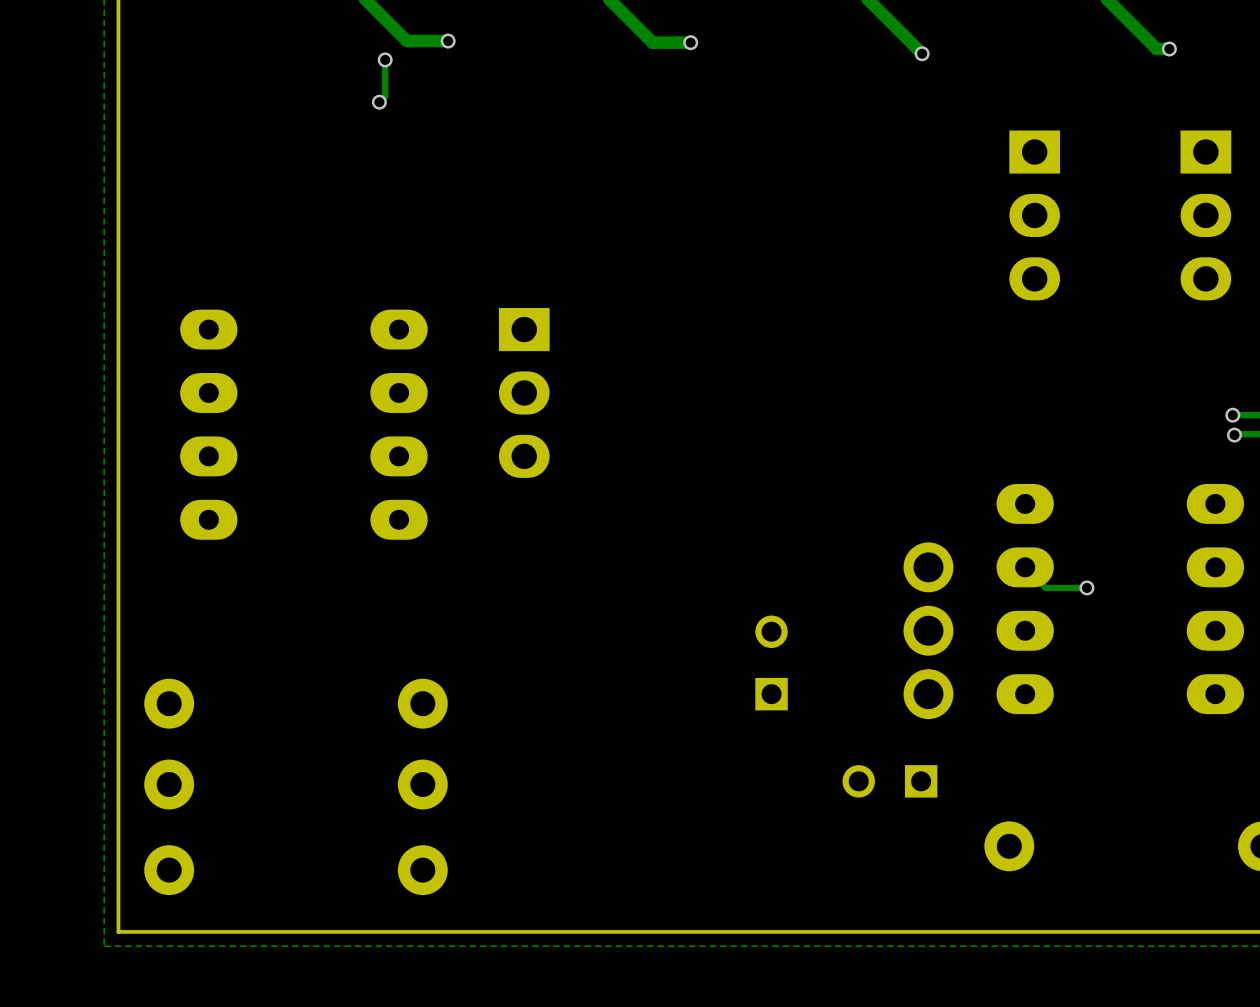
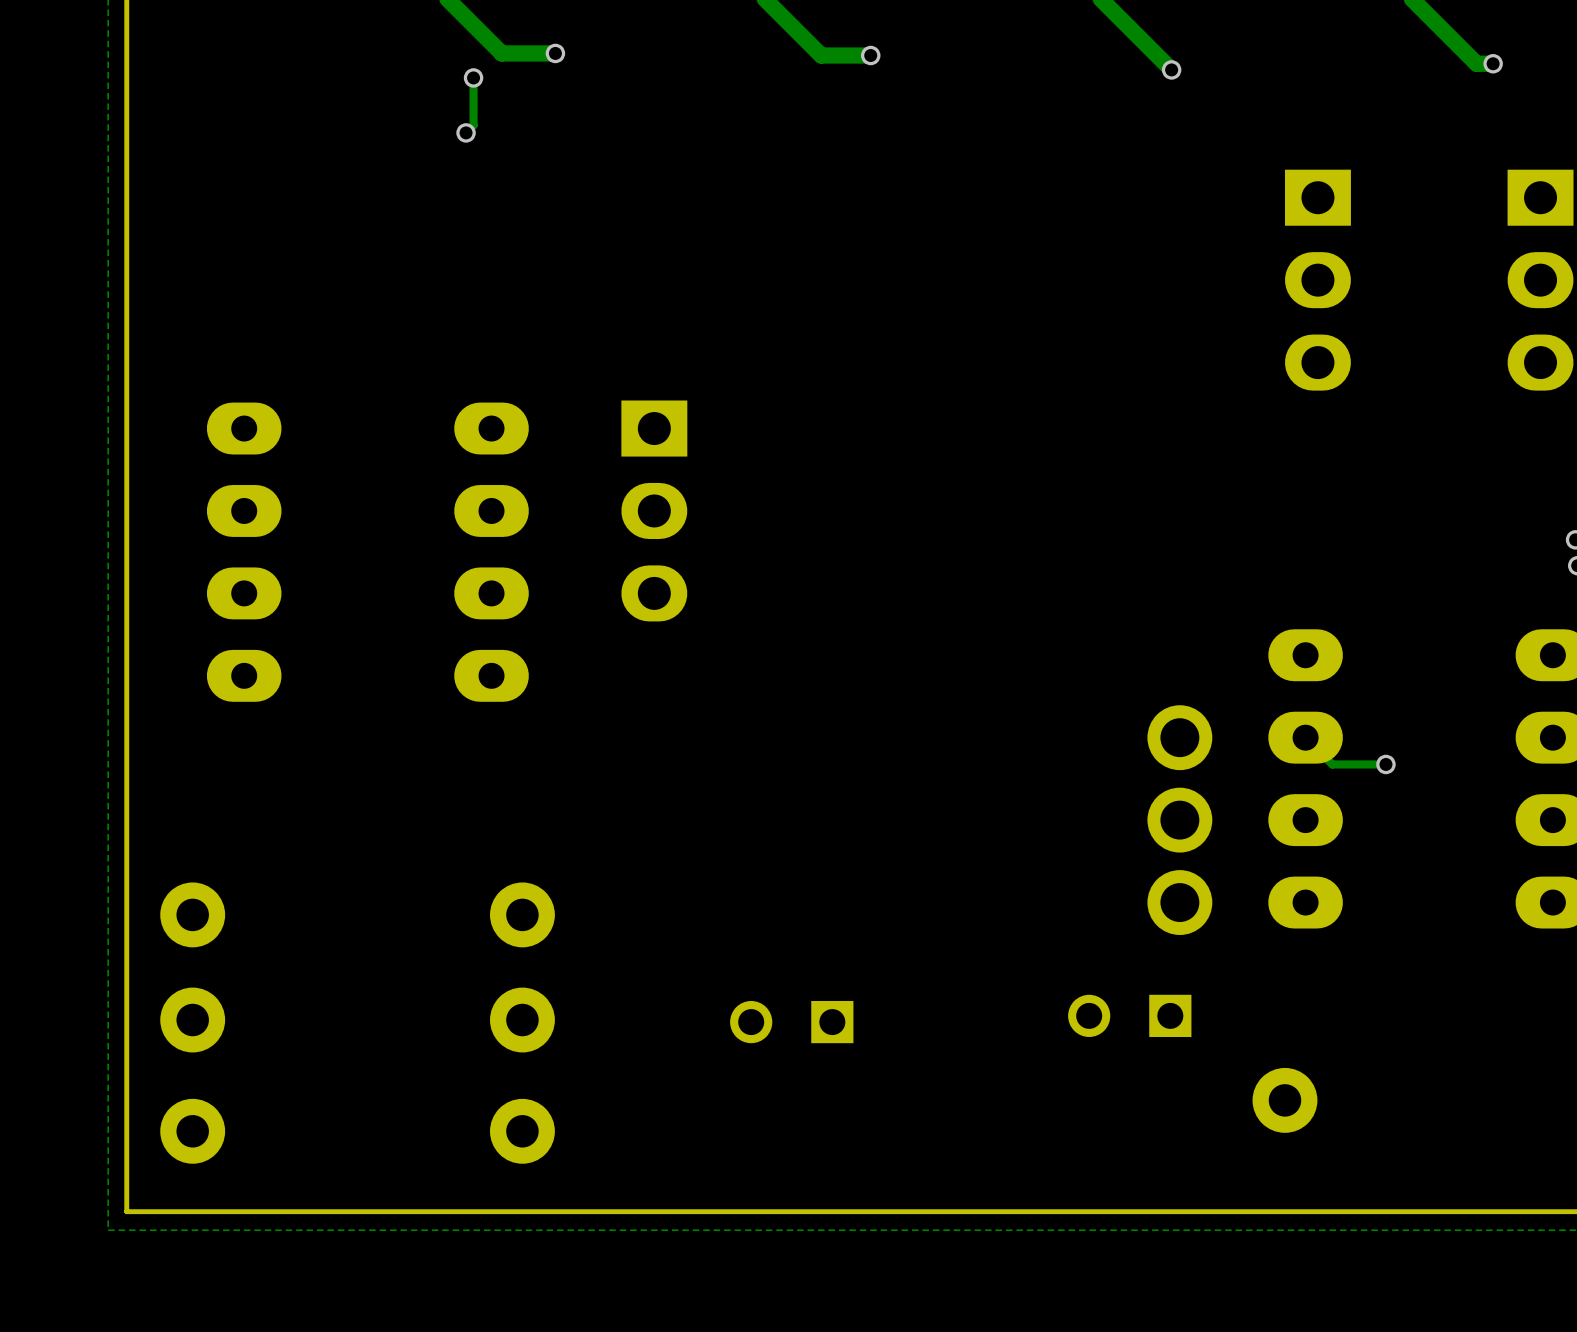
part rotation: 0° (771, 662) -> 90° counterclockwise (791, 1022)
part position: (771, 662) -> (791, 1022)

